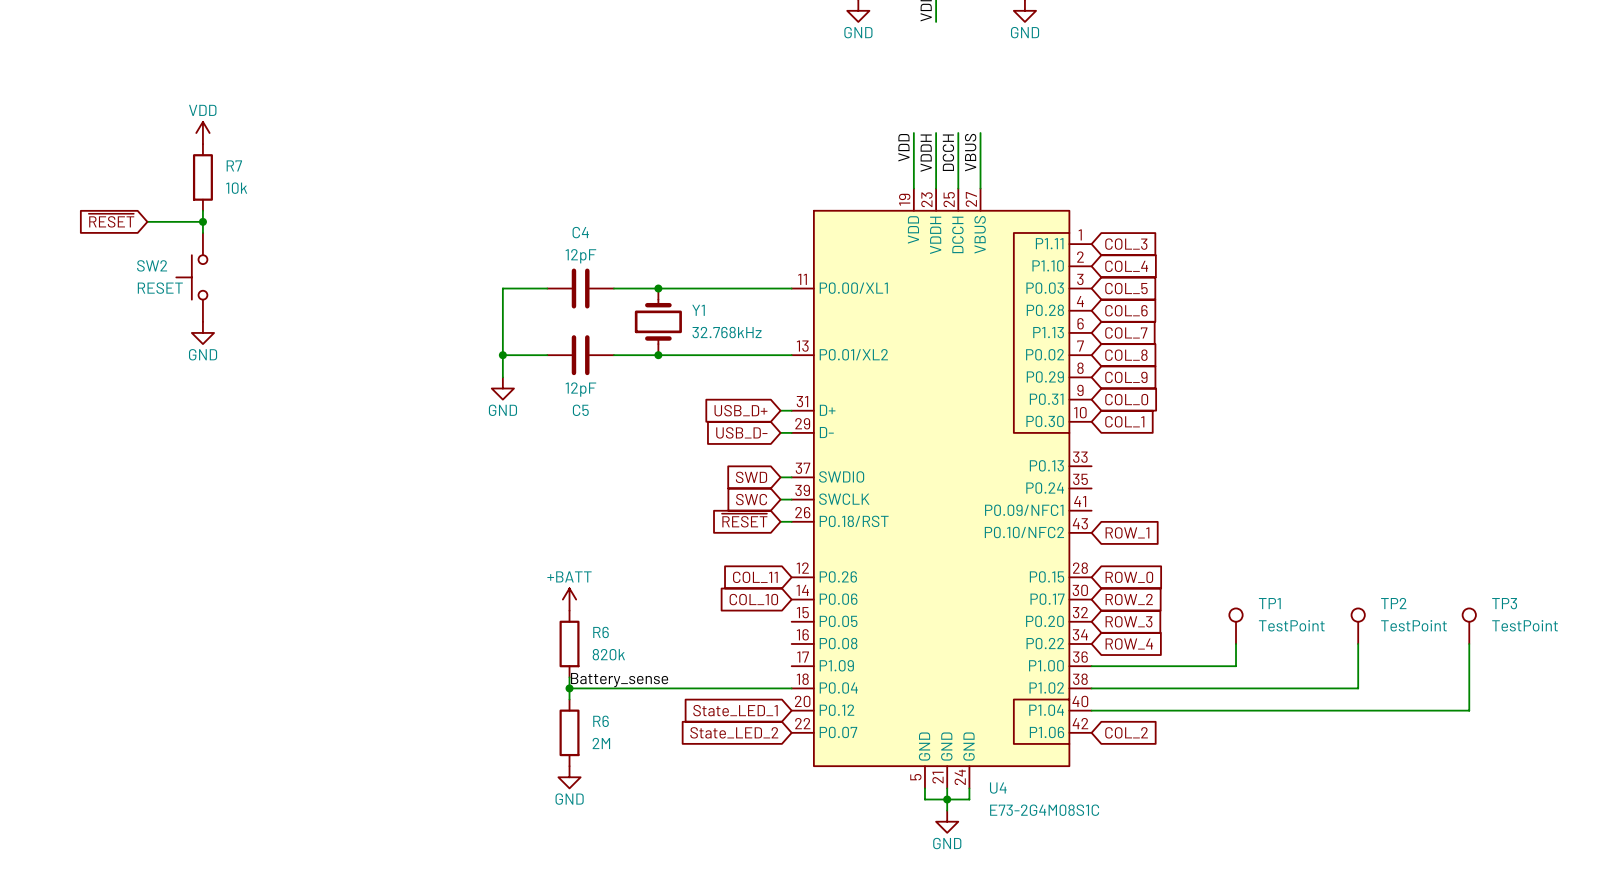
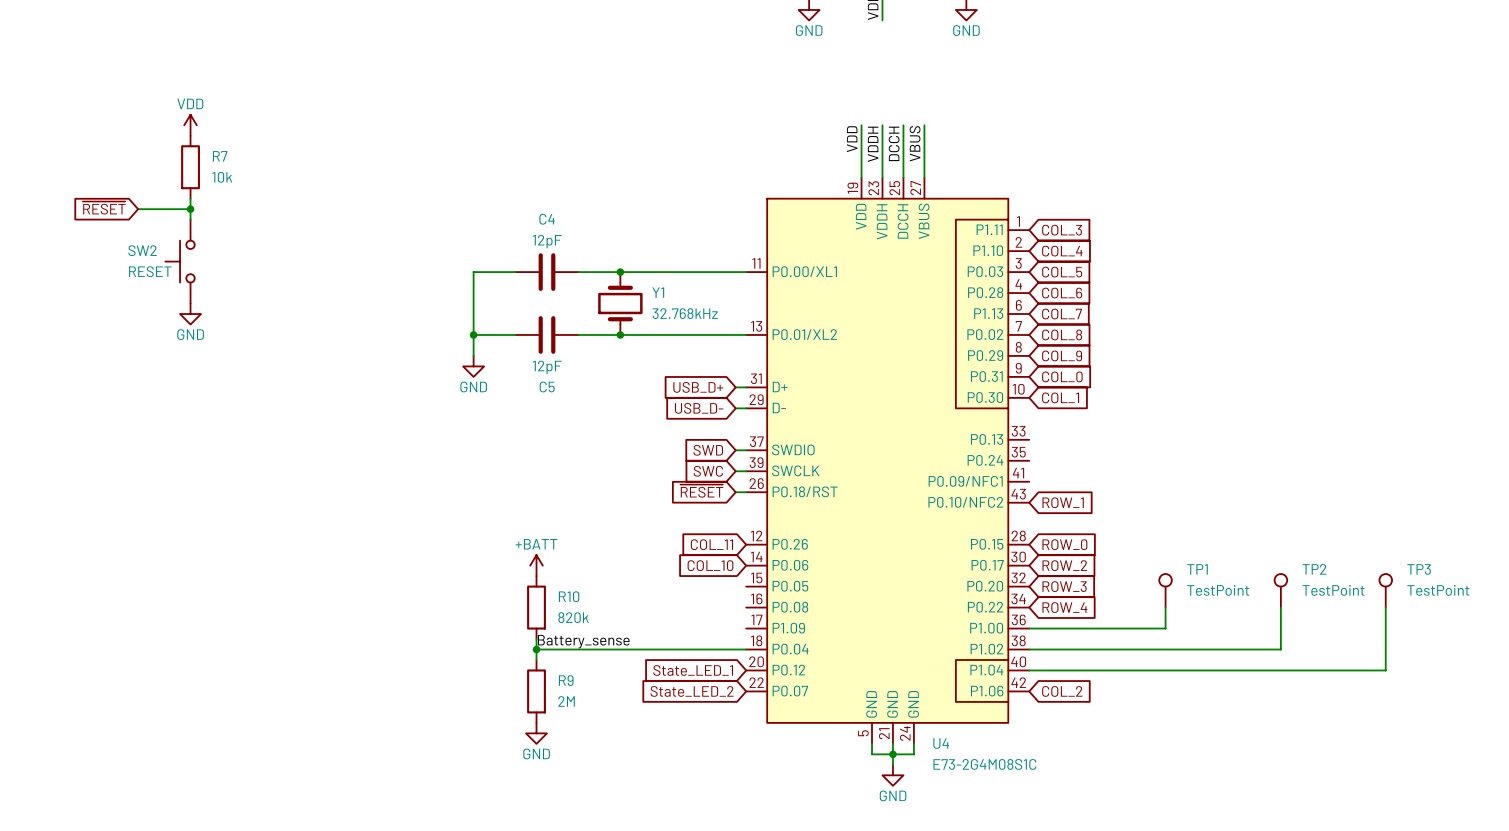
R6 name: R6 (601, 632) -> R10 (569, 596)
R6 name: R6 (601, 721) -> R9 (566, 680)

